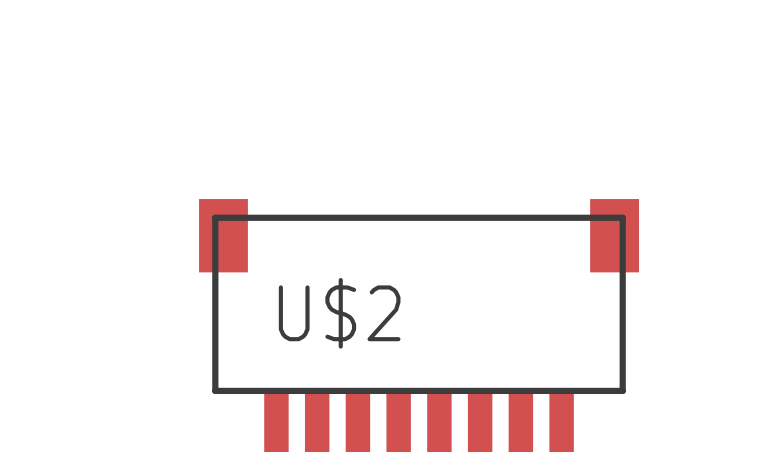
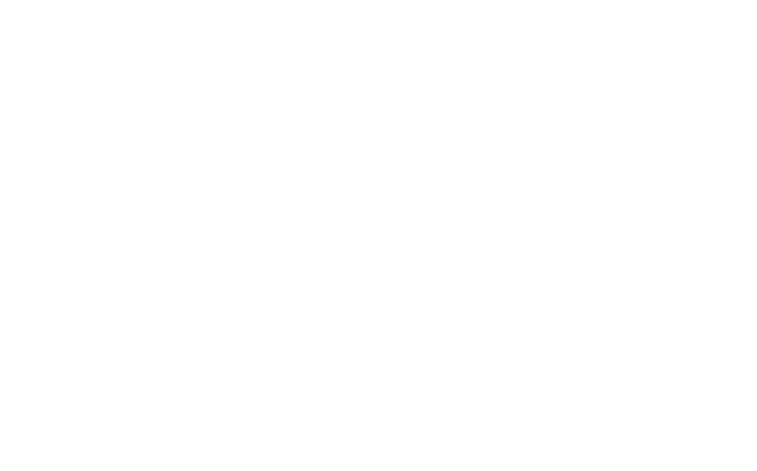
U$2: (419, 325) -> none

